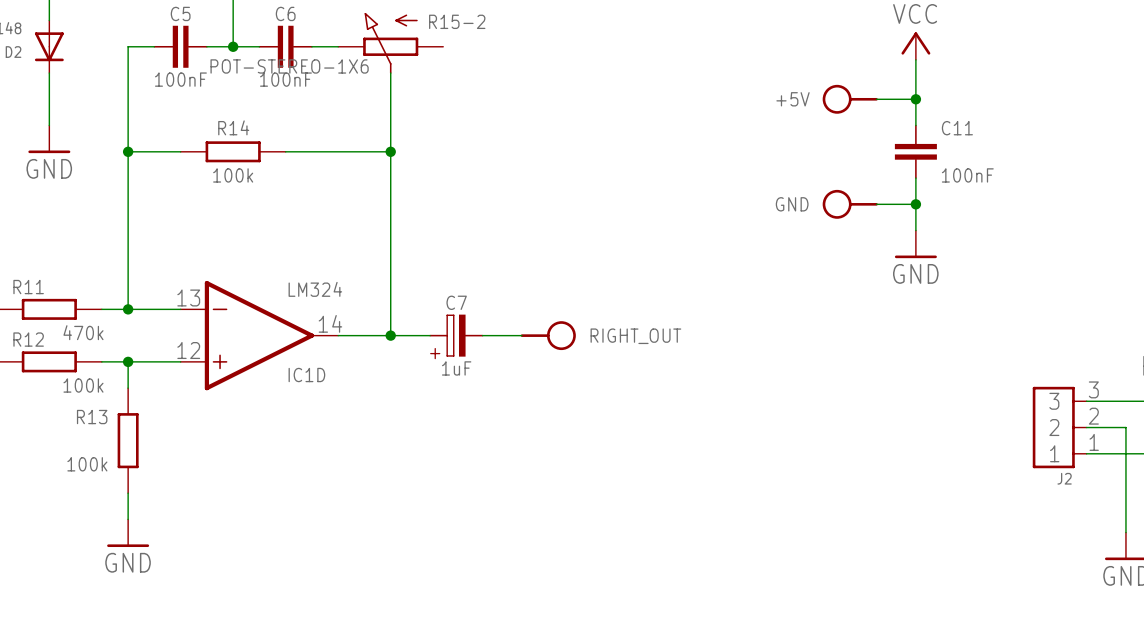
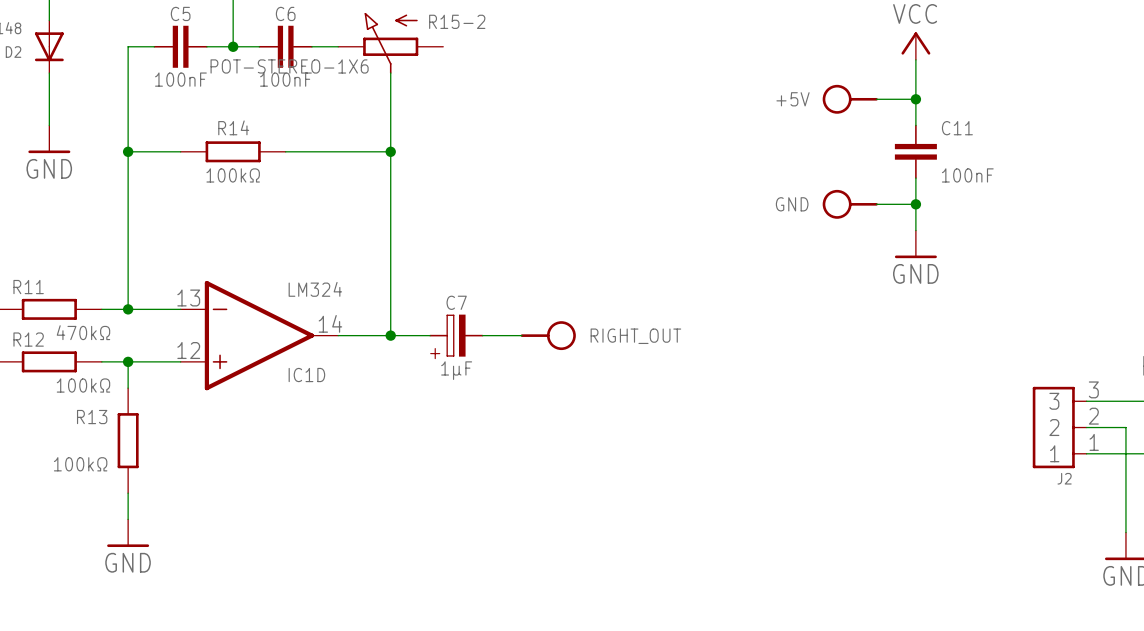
R14 value: 100k (233, 175) -> 100kΩ (233, 175)
R11 value: 470k (83, 332) -> 470kΩ (83, 332)
C7 value: 1uF (456, 368) -> 1μF (456, 370)
R12 value: 100k (83, 385) -> 100kΩ (83, 385)
R13 value: 100k (87, 464) -> 100kΩ (80, 464)

